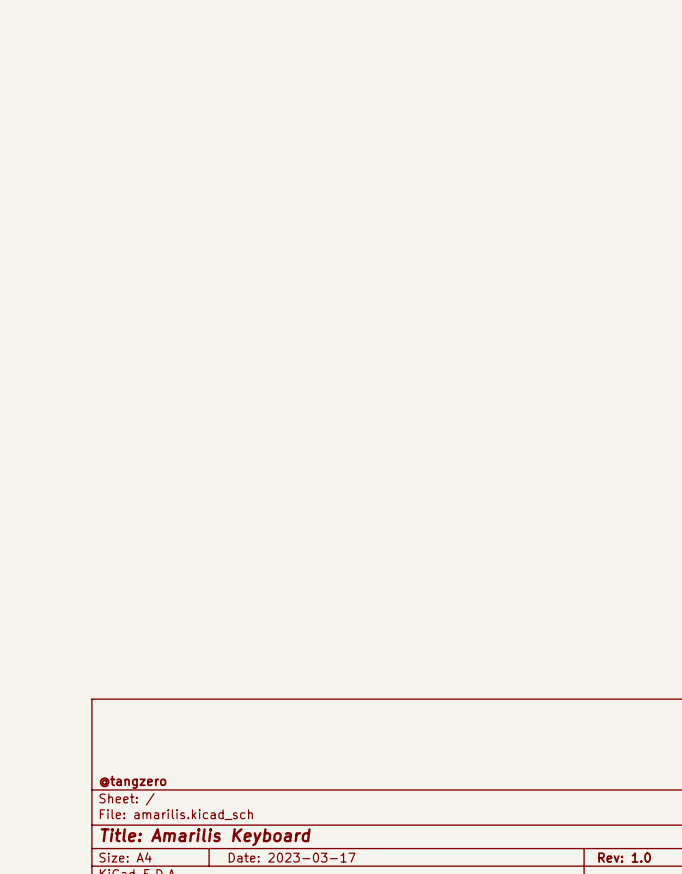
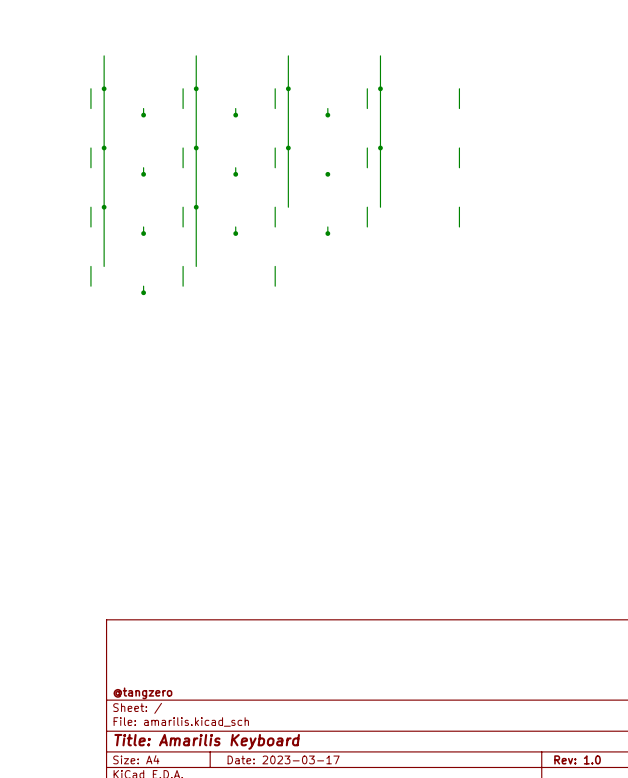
wire: none -> (104, 55) (104, 266)
wire: none -> (196, 55) (196, 266)
wire: none -> (288, 55) (288, 207)
wire: none -> (380, 55) (380, 207)
wire: none -> (90, 88) (90, 108)
junction: none -> (104, 88)
wire: none -> (183, 88) (183, 108)
junction: none -> (196, 88)
wire: none -> (275, 88) (275, 108)
junction: none -> (288, 88)
wire: none -> (367, 88) (367, 108)
junction: none -> (380, 88)
wire: none -> (459, 88) (459, 108)
wire: none -> (143, 108) (143, 115)
wire: none -> (235, 108) (235, 115)
wire: none -> (327, 108) (327, 115)
junction: none -> (143, 115)
junction: none -> (235, 115)
junction: none -> (327, 115)
wire: none -> (90, 148) (90, 167)
junction: none -> (104, 148)
wire: none -> (183, 148) (183, 167)
junction: none -> (196, 148)
wire: none -> (275, 148) (275, 167)
junction: none -> (288, 148)
wire: none -> (367, 148) (367, 167)
junction: none -> (380, 148)
wire: none -> (459, 148) (459, 167)
wire: none -> (143, 167) (143, 174)
wire: none -> (235, 167) (235, 174)
junction: none -> (143, 174)
junction: none -> (235, 174)
junction: none -> (327, 174)
wire: none -> (90, 207) (90, 226)
junction: none -> (104, 207)
wire: none -> (183, 207) (183, 226)
junction: none -> (196, 207)
wire: none -> (275, 207) (275, 226)
wire: none -> (367, 207) (367, 226)
wire: none -> (459, 207) (459, 226)
wire: none -> (143, 226) (143, 233)
wire: none -> (235, 226) (235, 233)
wire: none -> (327, 226) (327, 233)
junction: none -> (143, 233)
junction: none -> (235, 233)
junction: none -> (327, 233)
wire: none -> (90, 266) (90, 286)
wire: none -> (183, 266) (183, 286)
wire: none -> (275, 266) (275, 286)
wire: none -> (143, 286) (143, 292)
junction: none -> (143, 292)

